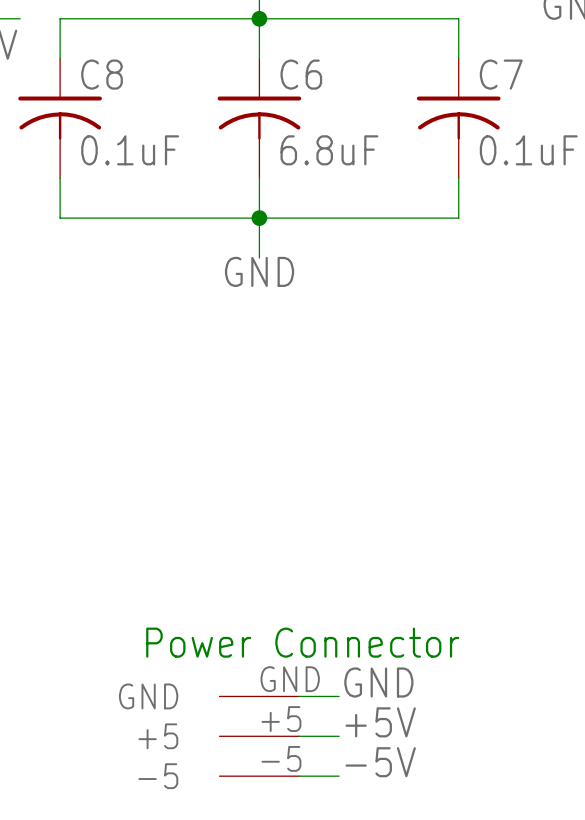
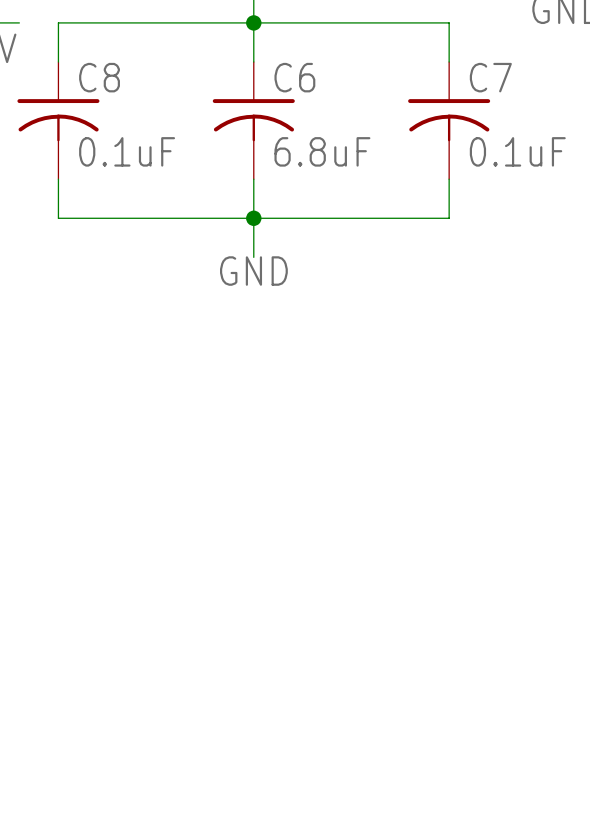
text: Power Connector (302, 642) -> none
label: GND (378, 682) -> none
wire: (299, 696) (339, 696) -> none
label: +5V (380, 722) -> none
part: (259, 736) -> none
wire: (299, 736) (339, 736) -> none
label: -5V (380, 762) -> none
wire: (299, 776) (339, 776) -> none

